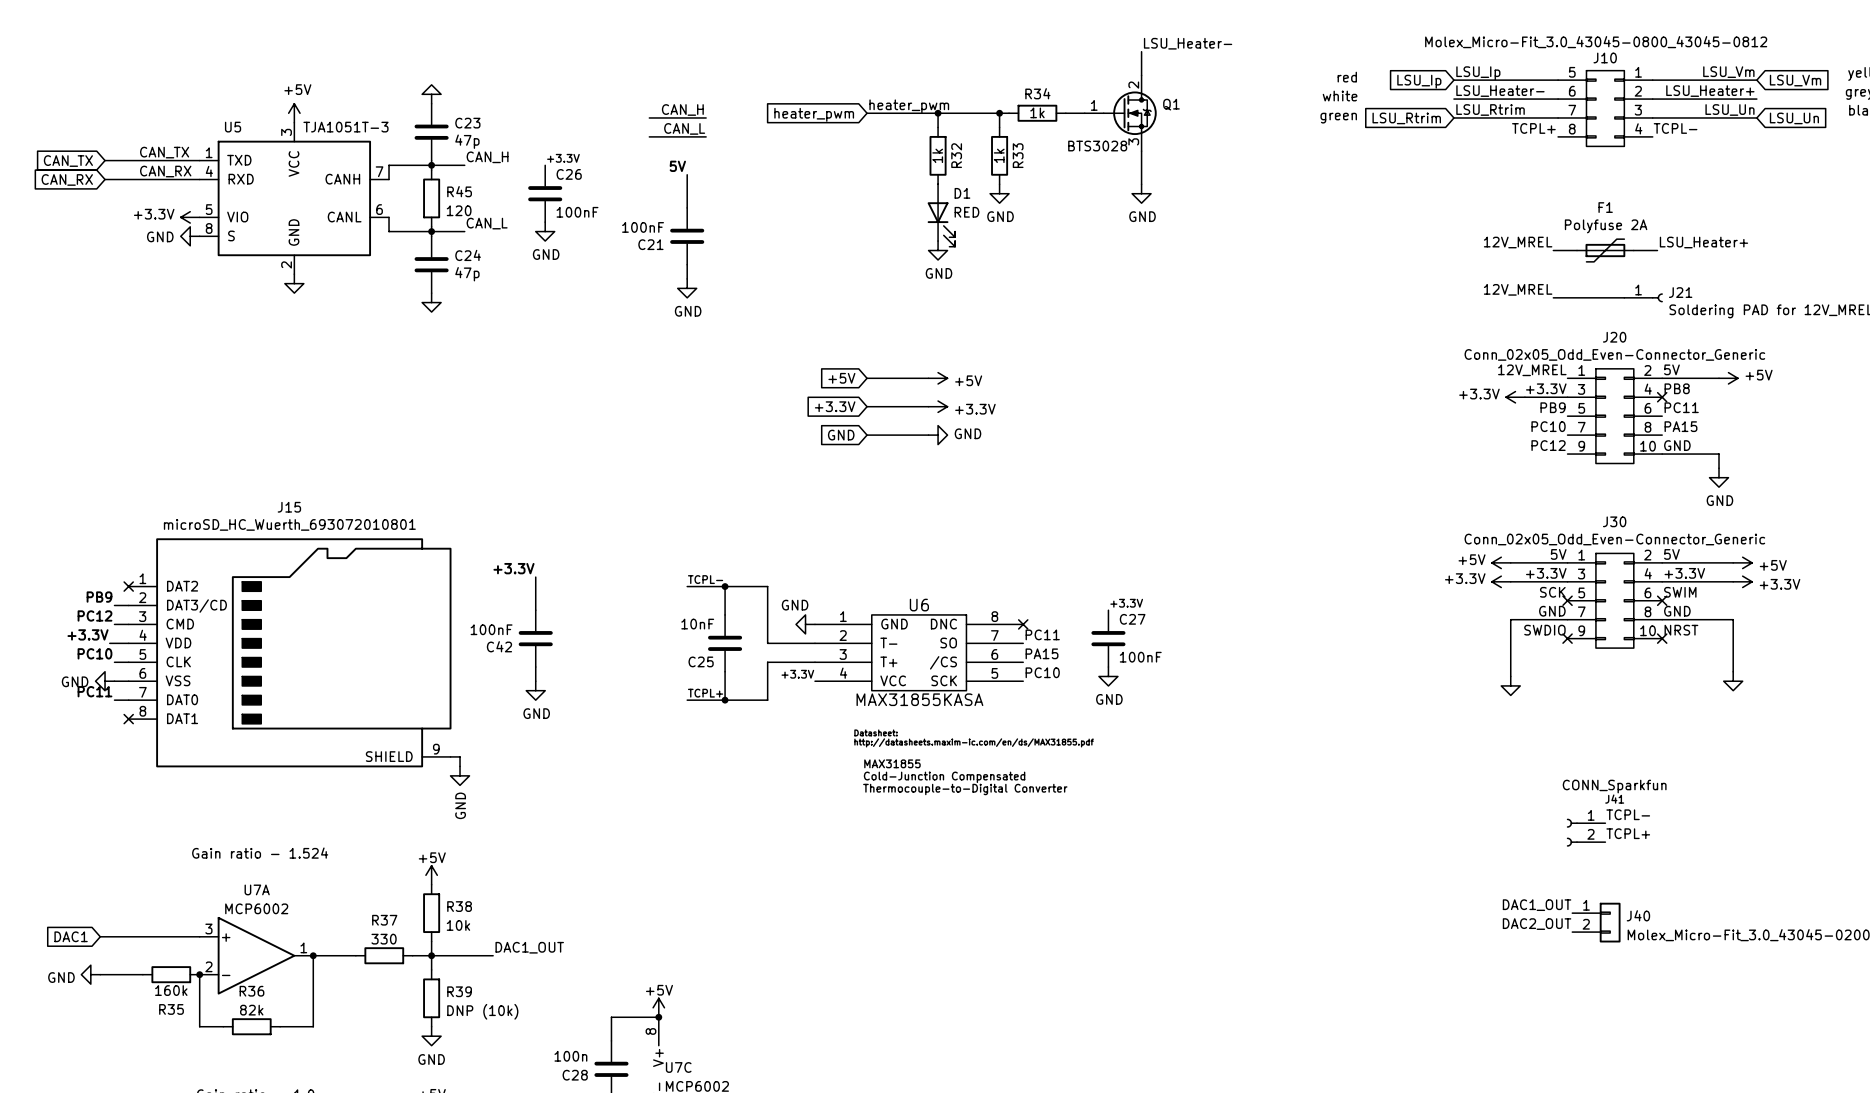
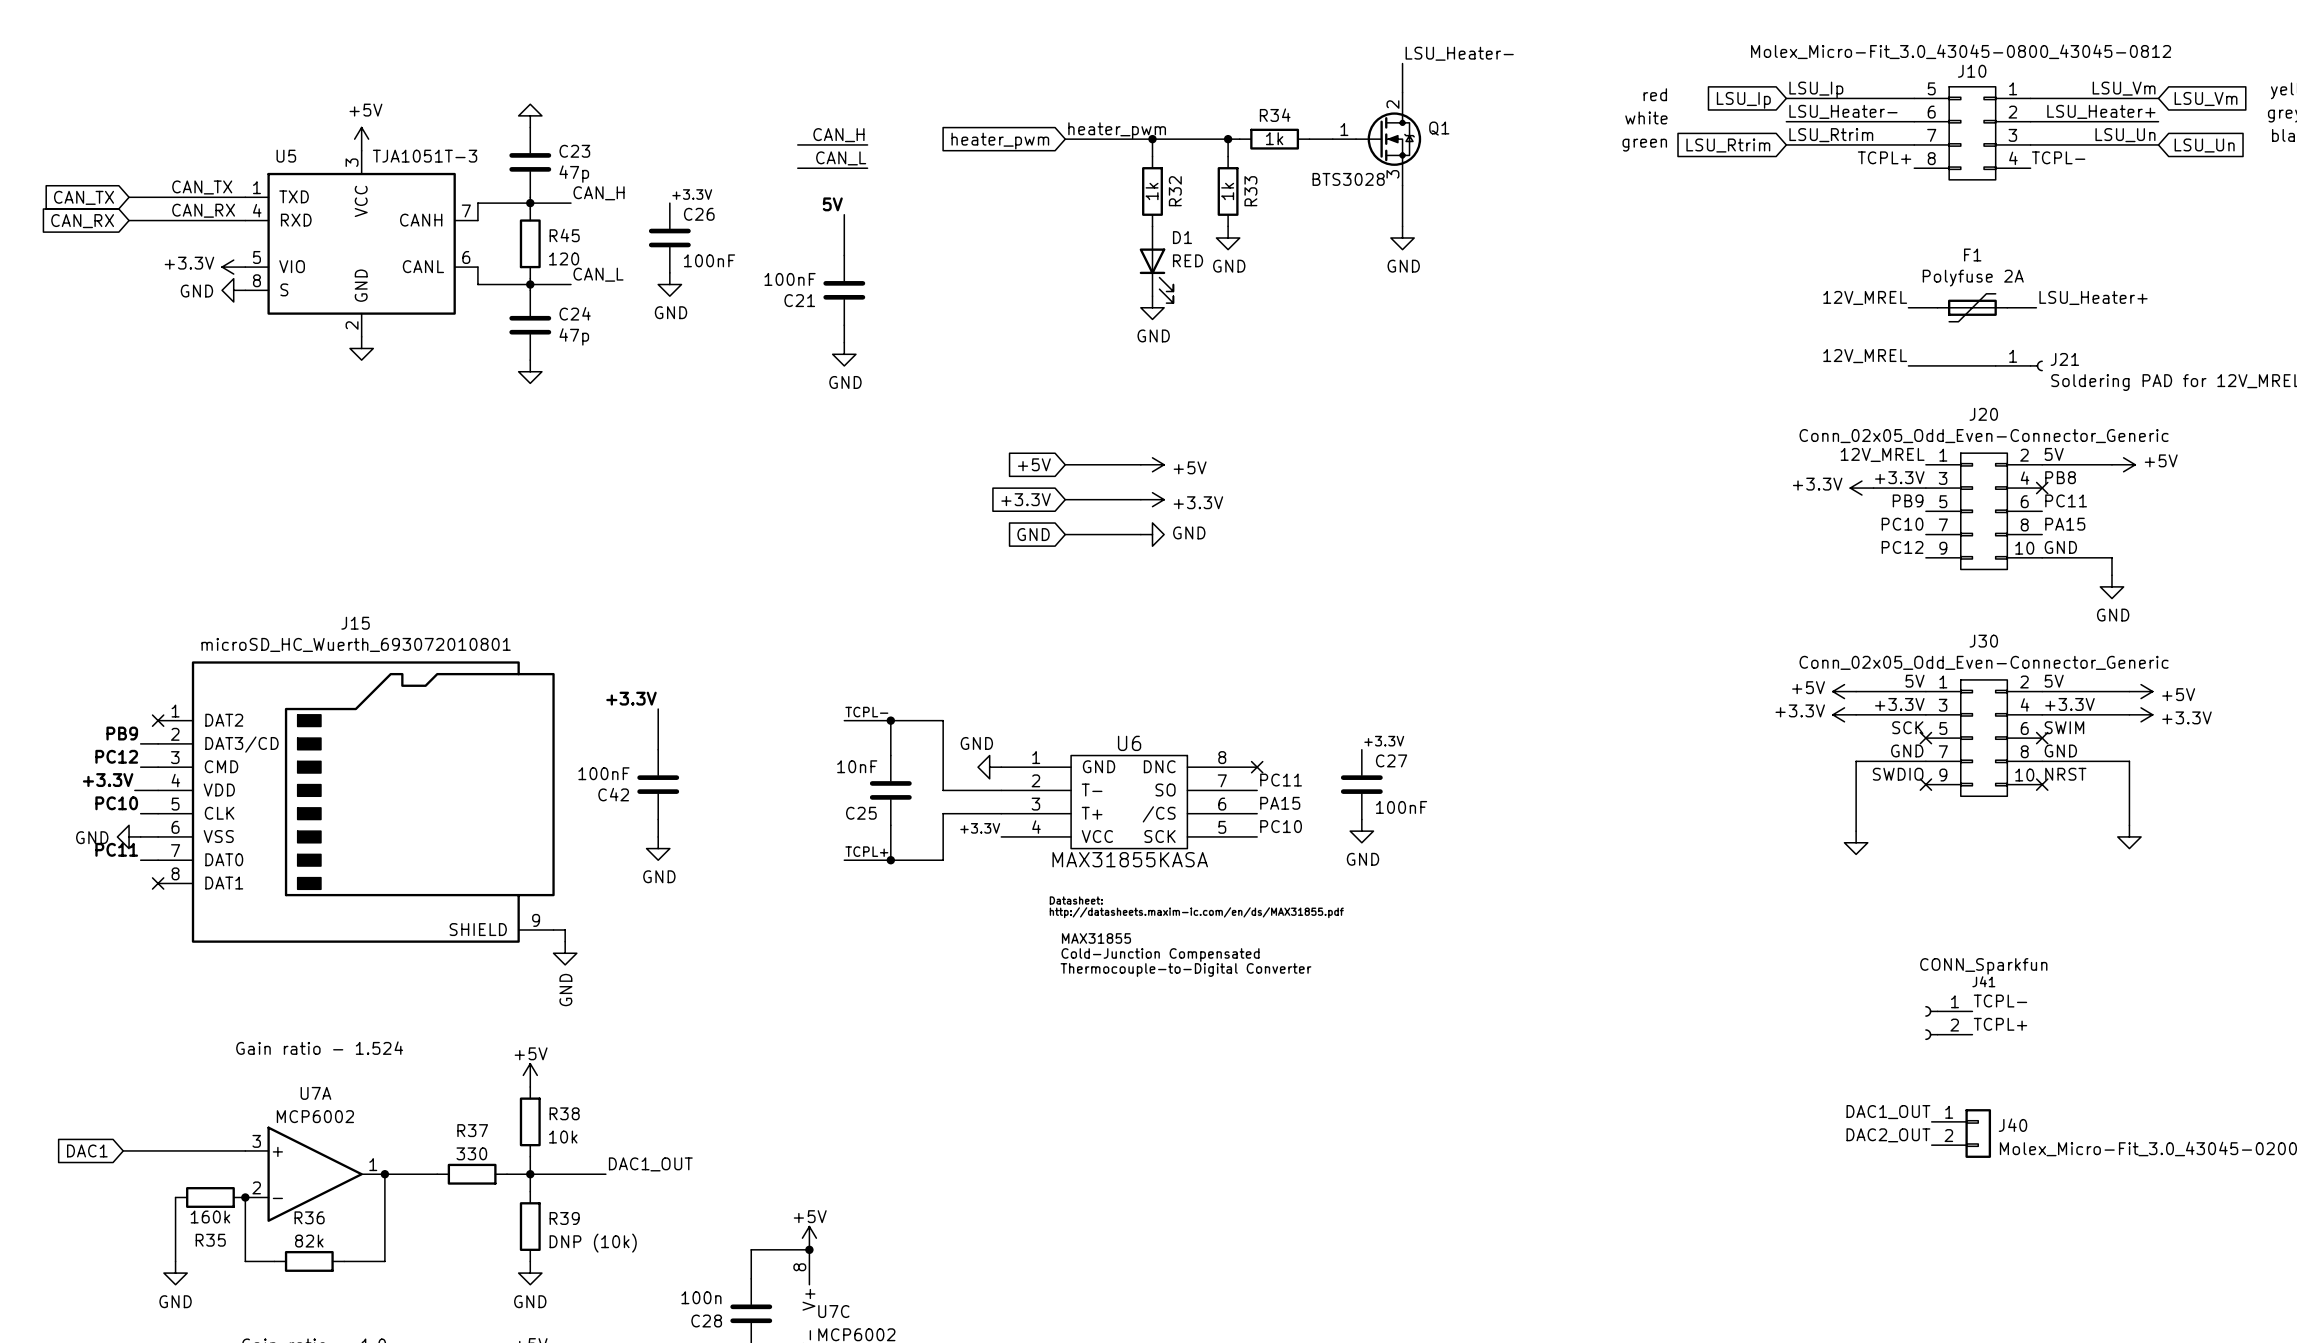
power symbol rotation: 0° (90, 974) -> 90° counterclockwise (175, 1273)
power symbol position: GND (90, 974) -> GND (175, 1273)
wire: (100, 974) (142, 974) -> (175, 1261) (175, 1197)

